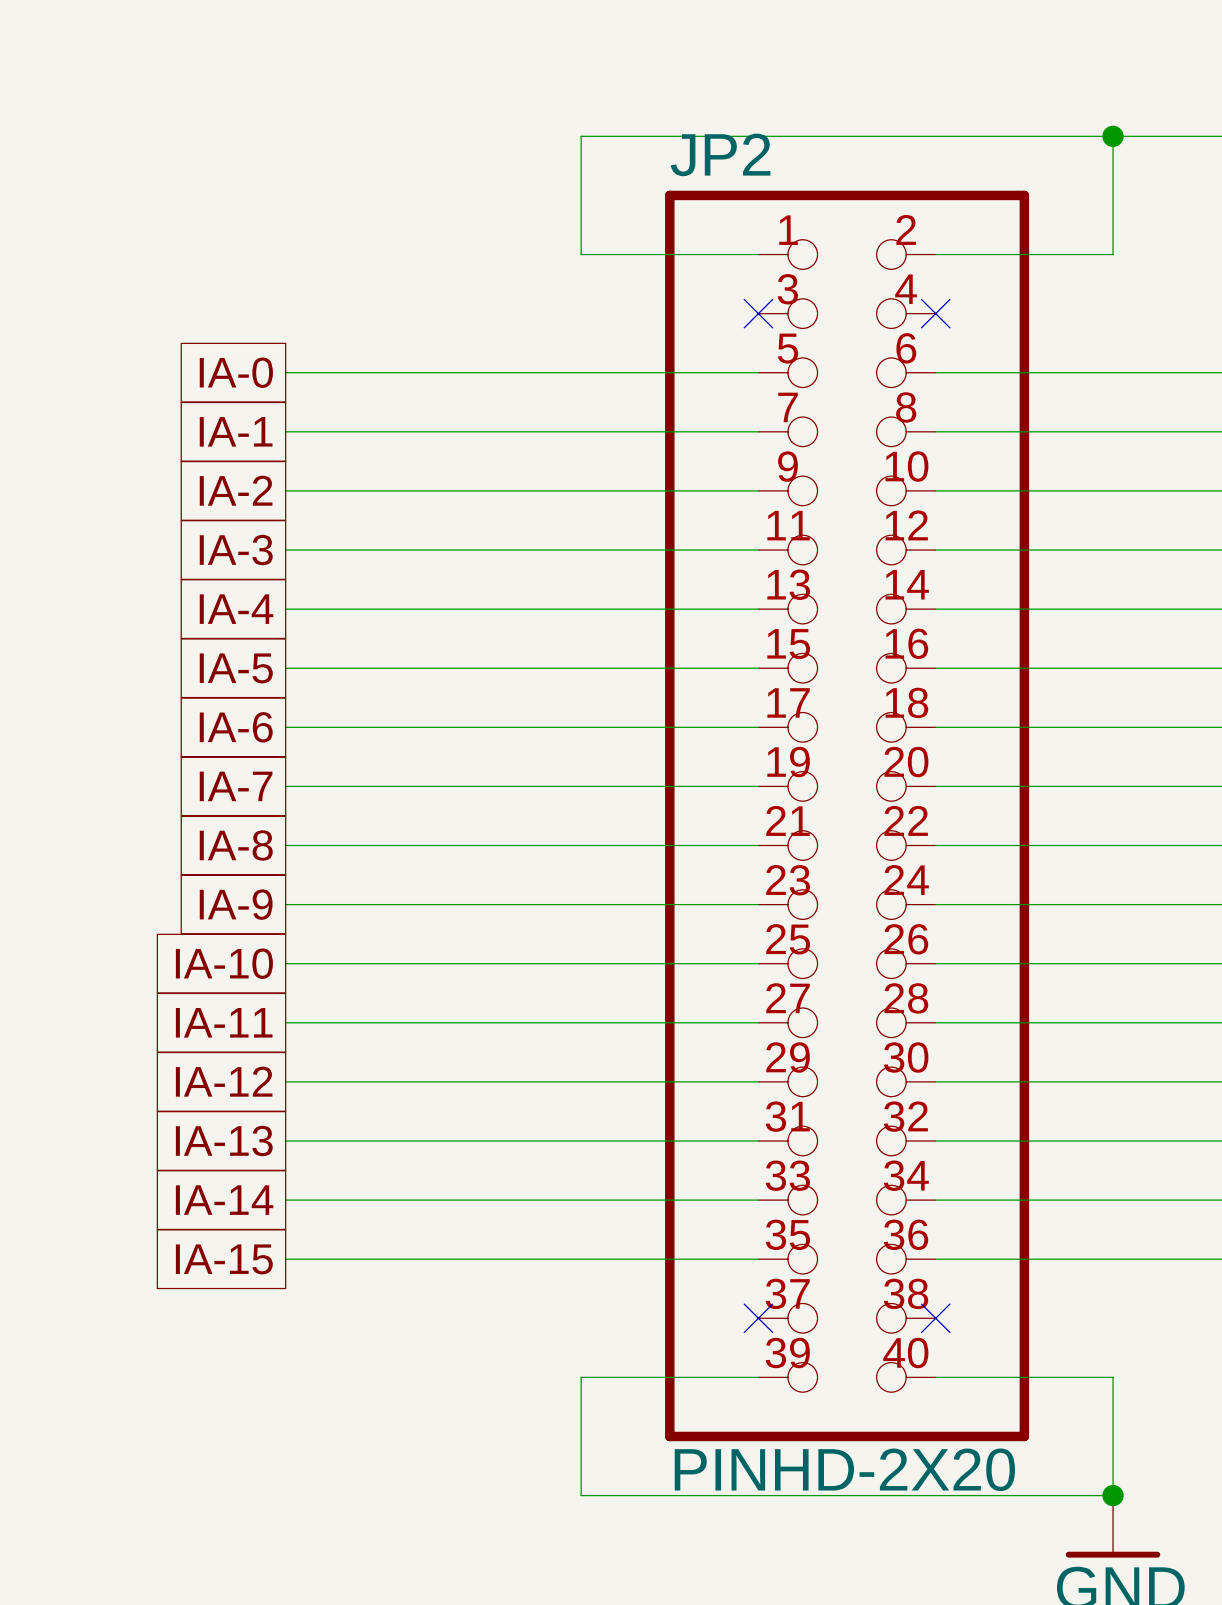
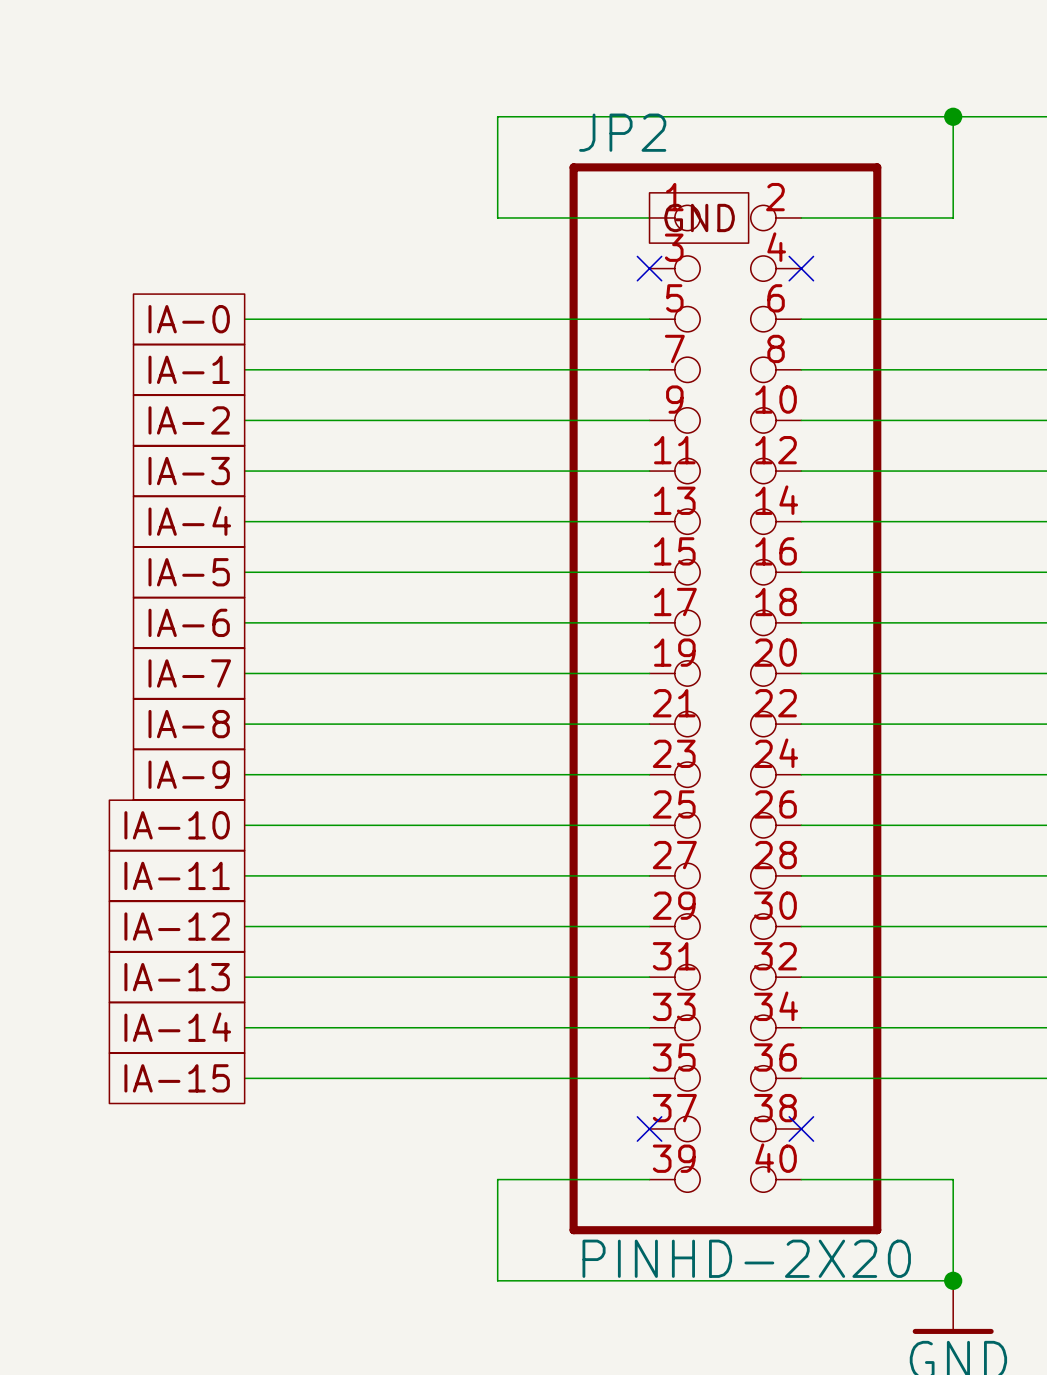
global label: none -> GND (699, 217)

